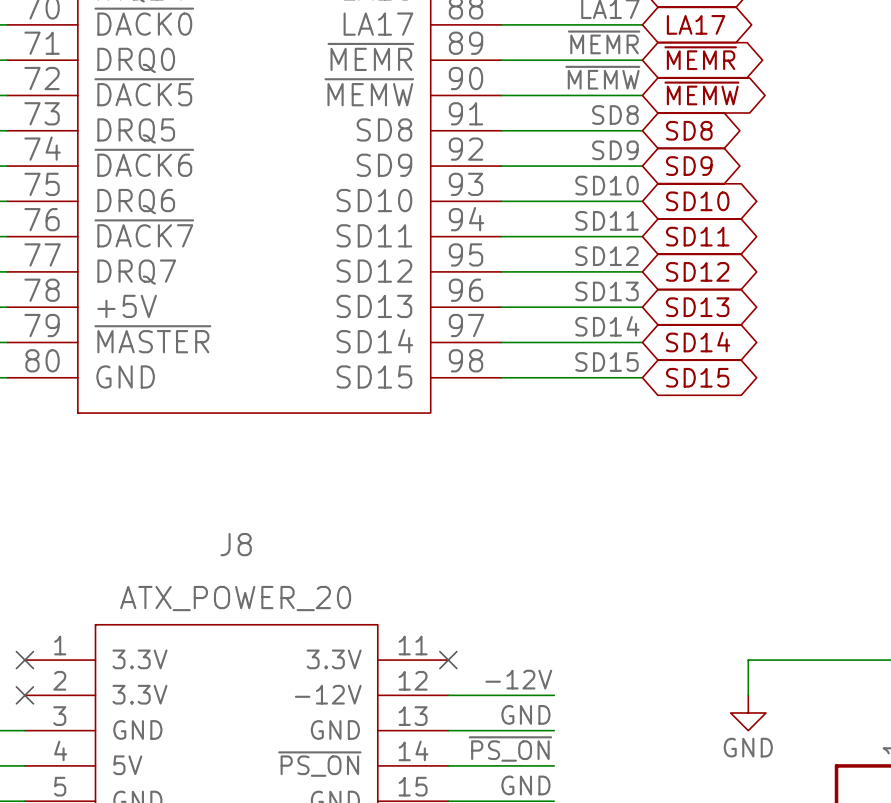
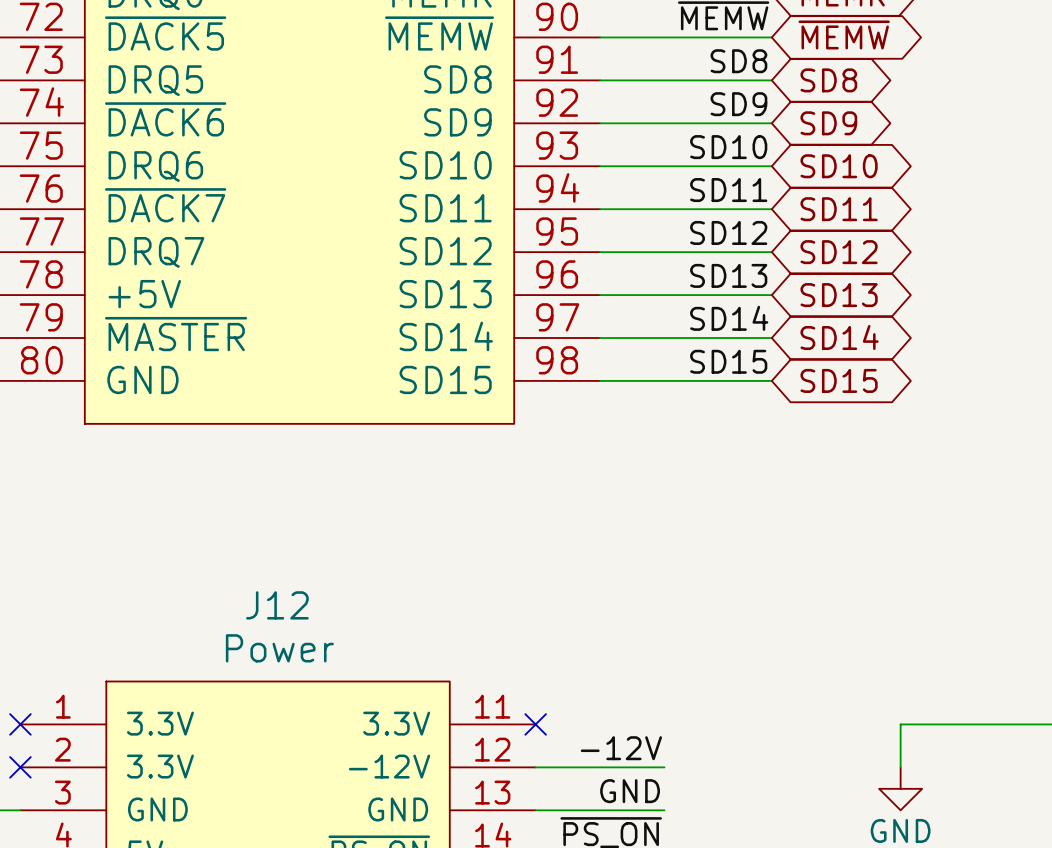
J8 name: J8 (236, 544) -> J12 (277, 605)
J8 value: ATX_POWER_20 (235, 598) -> Power (279, 648)

